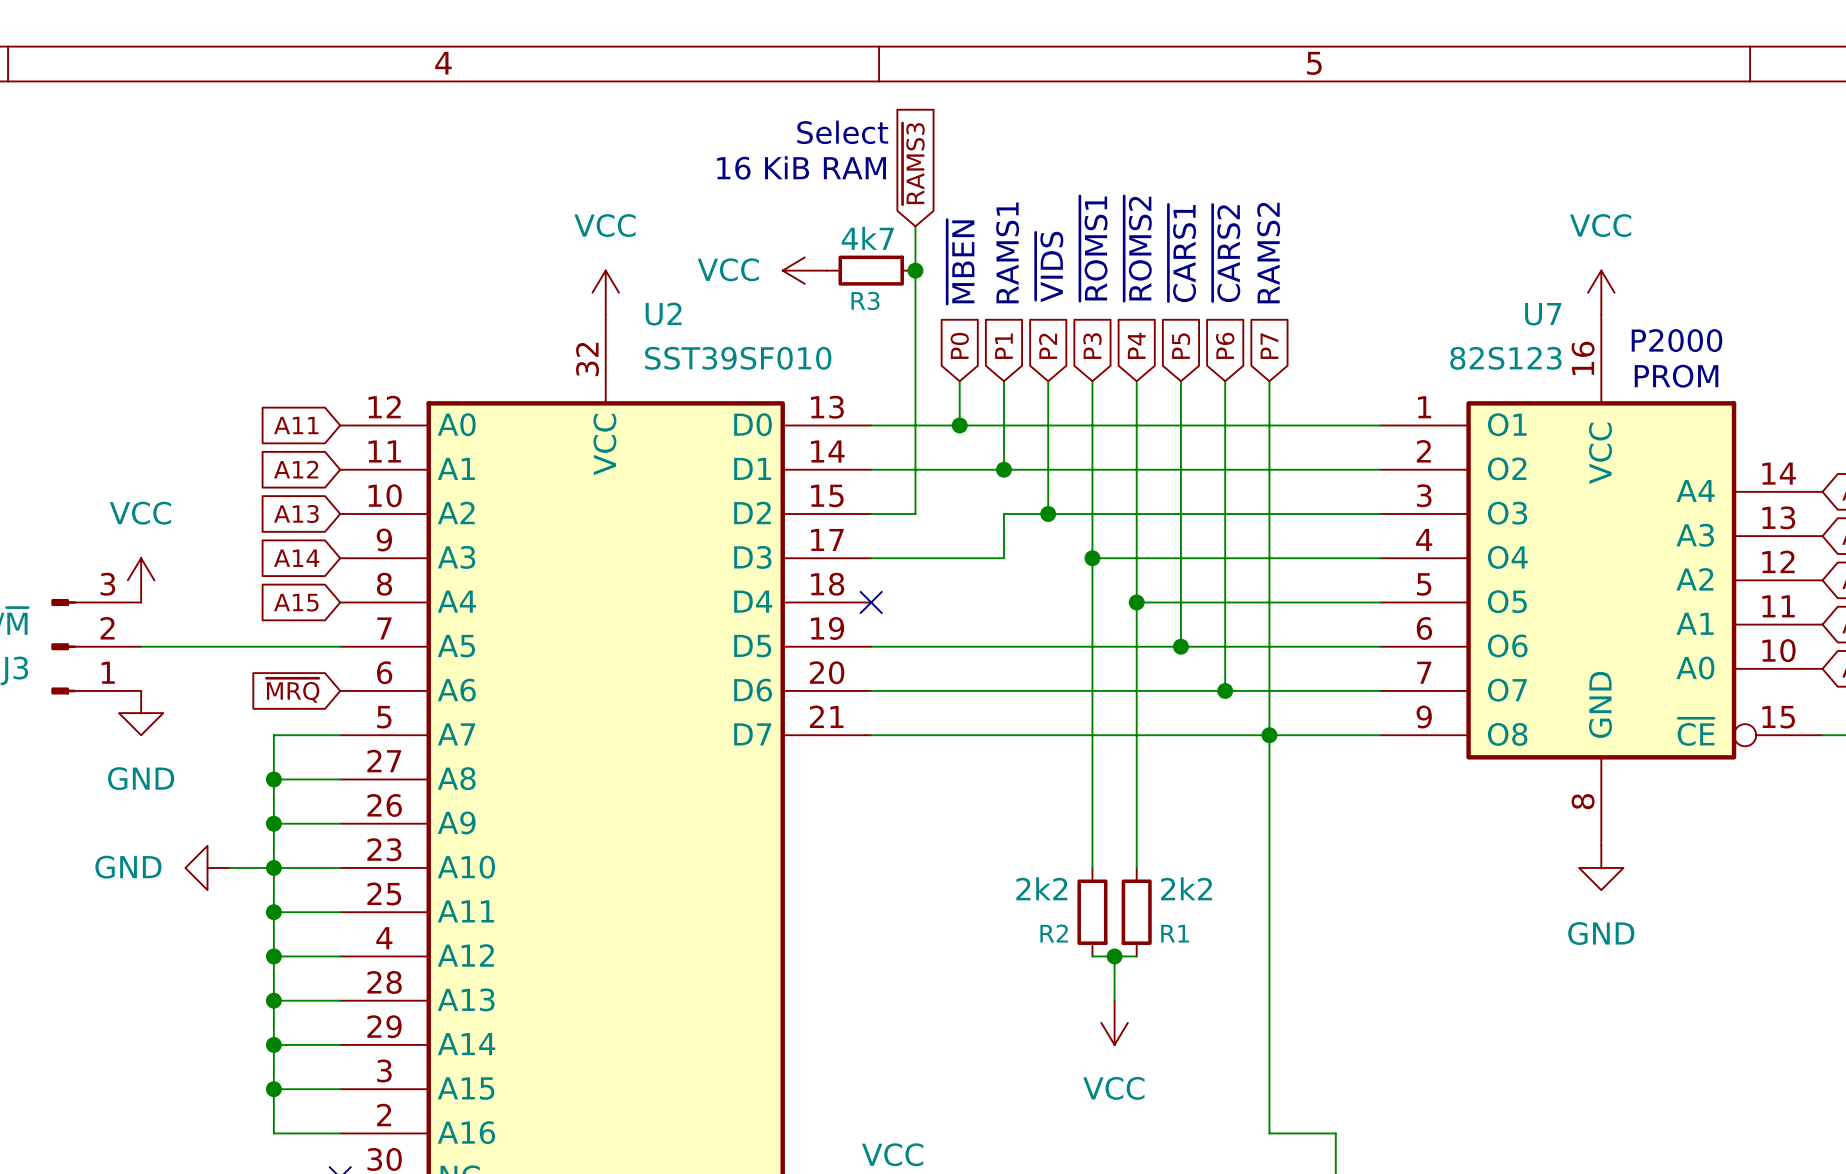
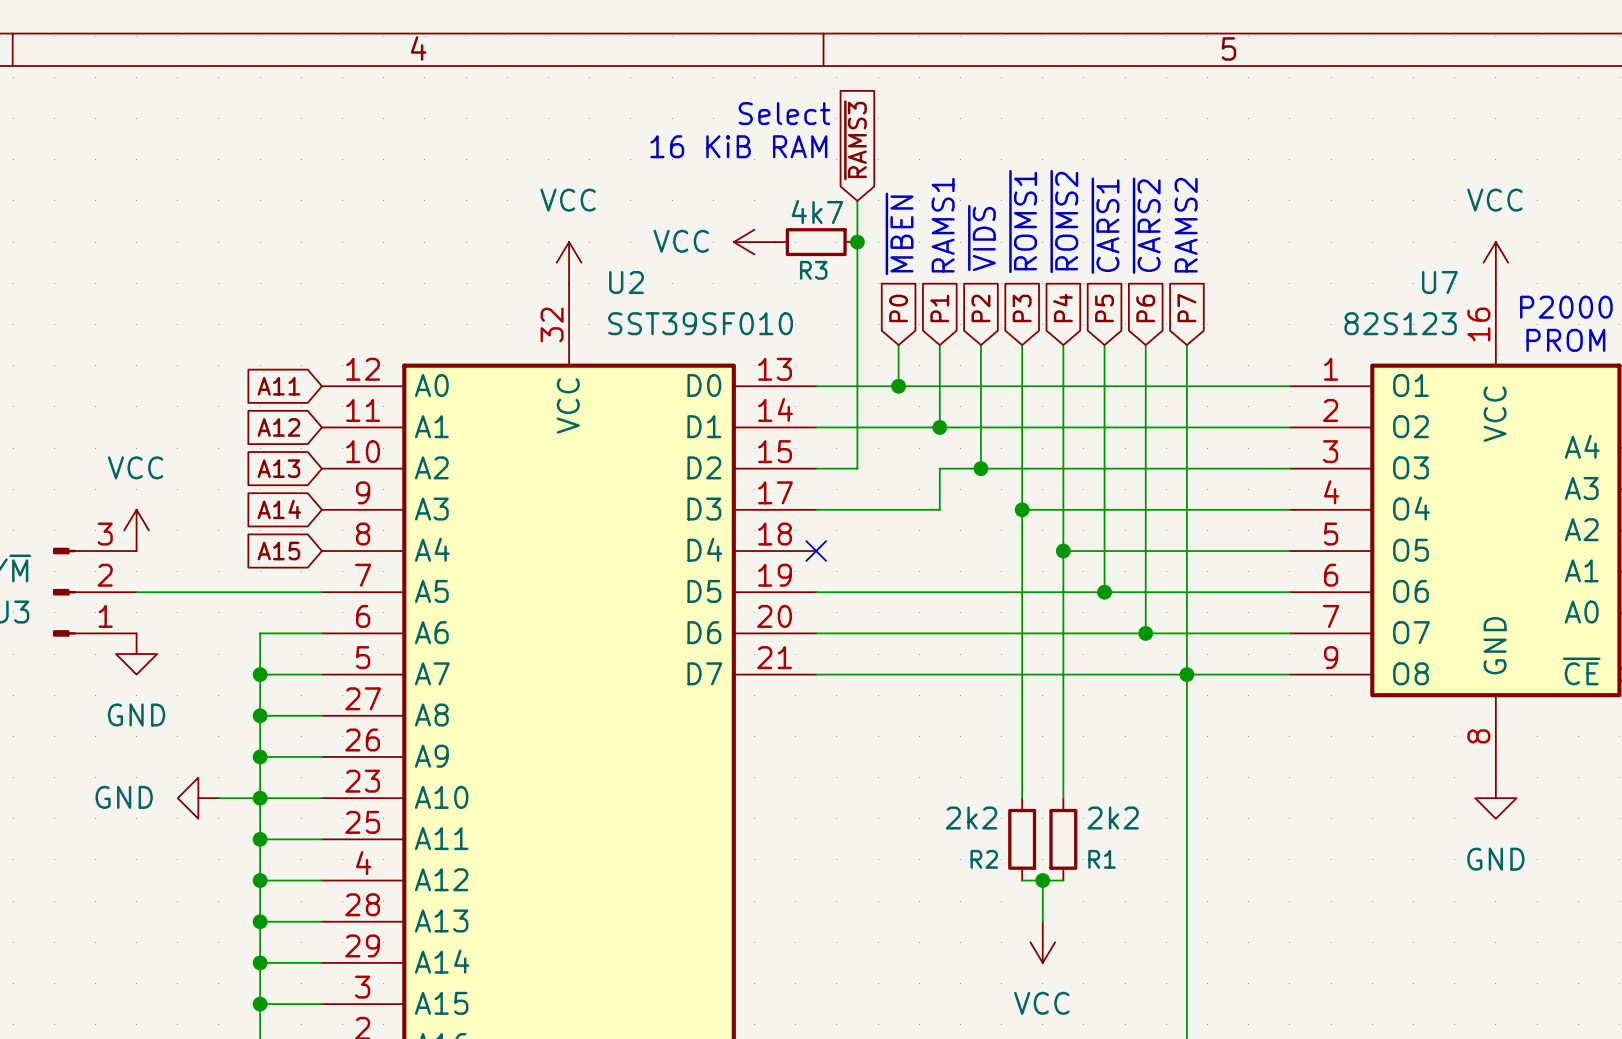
global label: ~{MRQ} (292, 690) -> none
wire: none -> (321, 633) (260, 633) (260, 674)
junction: none -> (260, 674)

